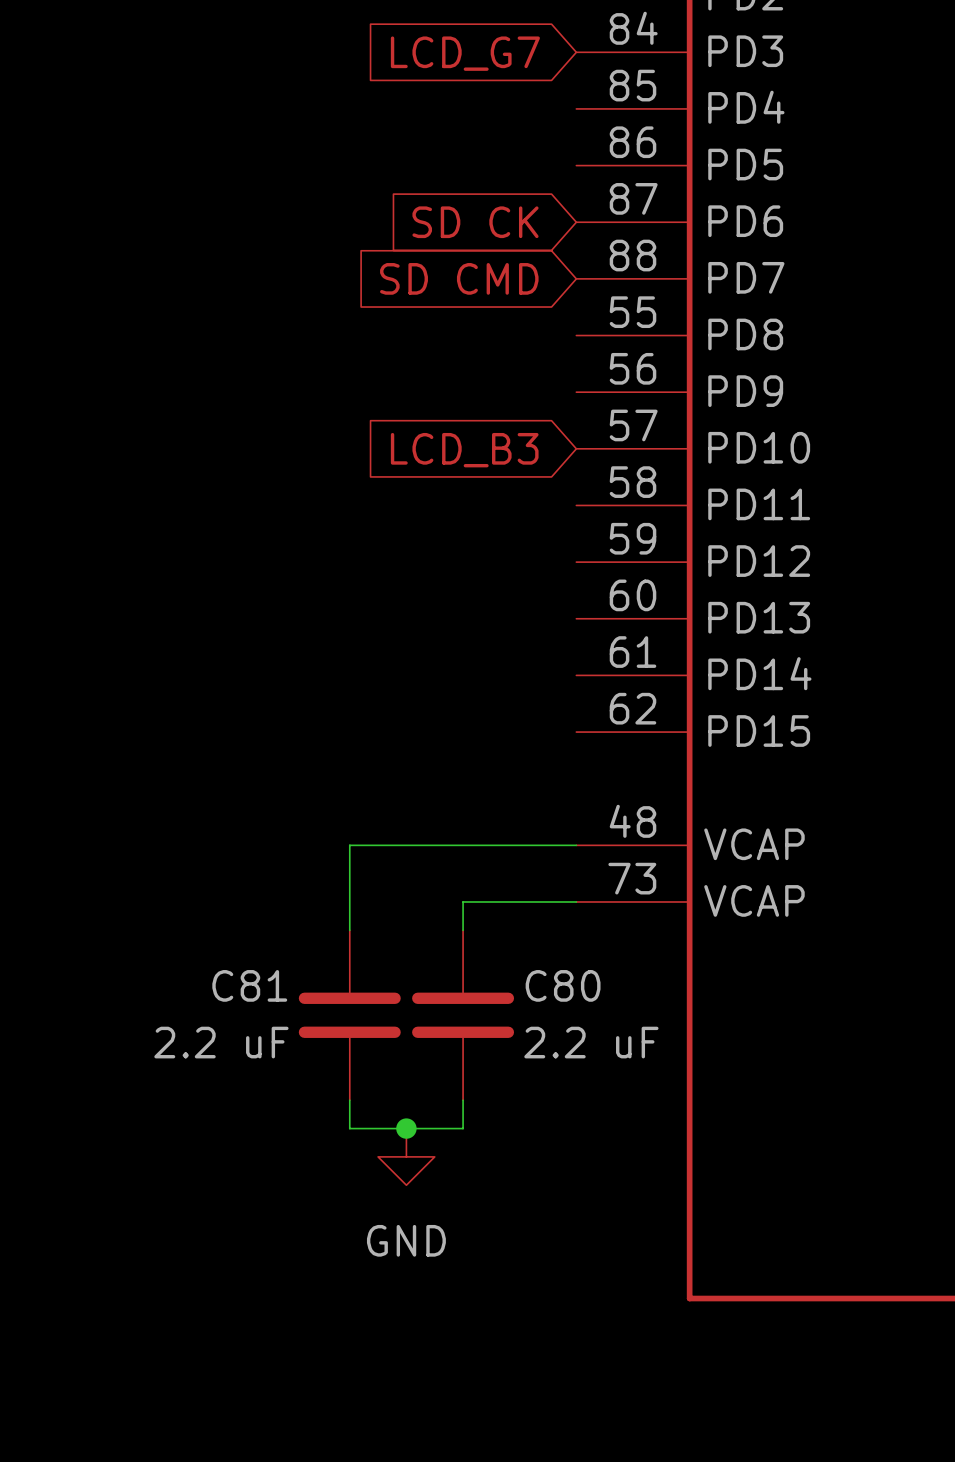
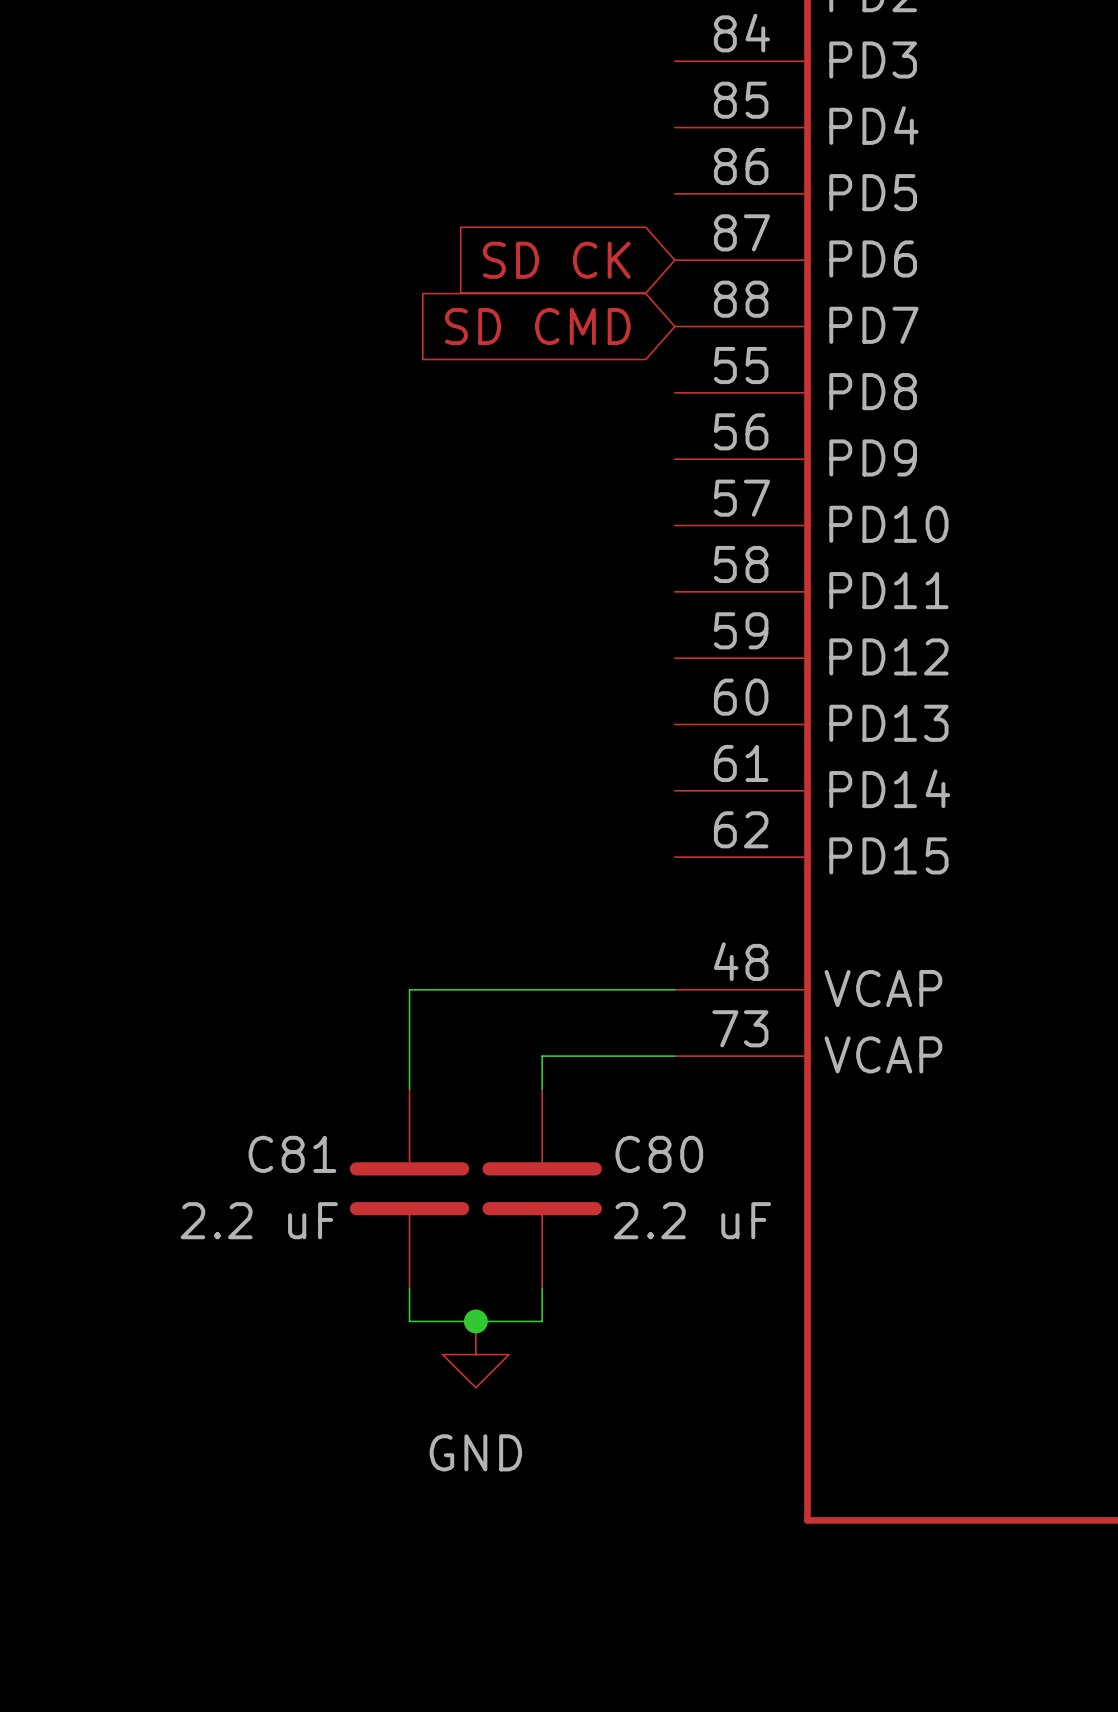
global label: LCD_G7 (465, 53) -> none
global label: LCD_B3 (464, 450) -> none

